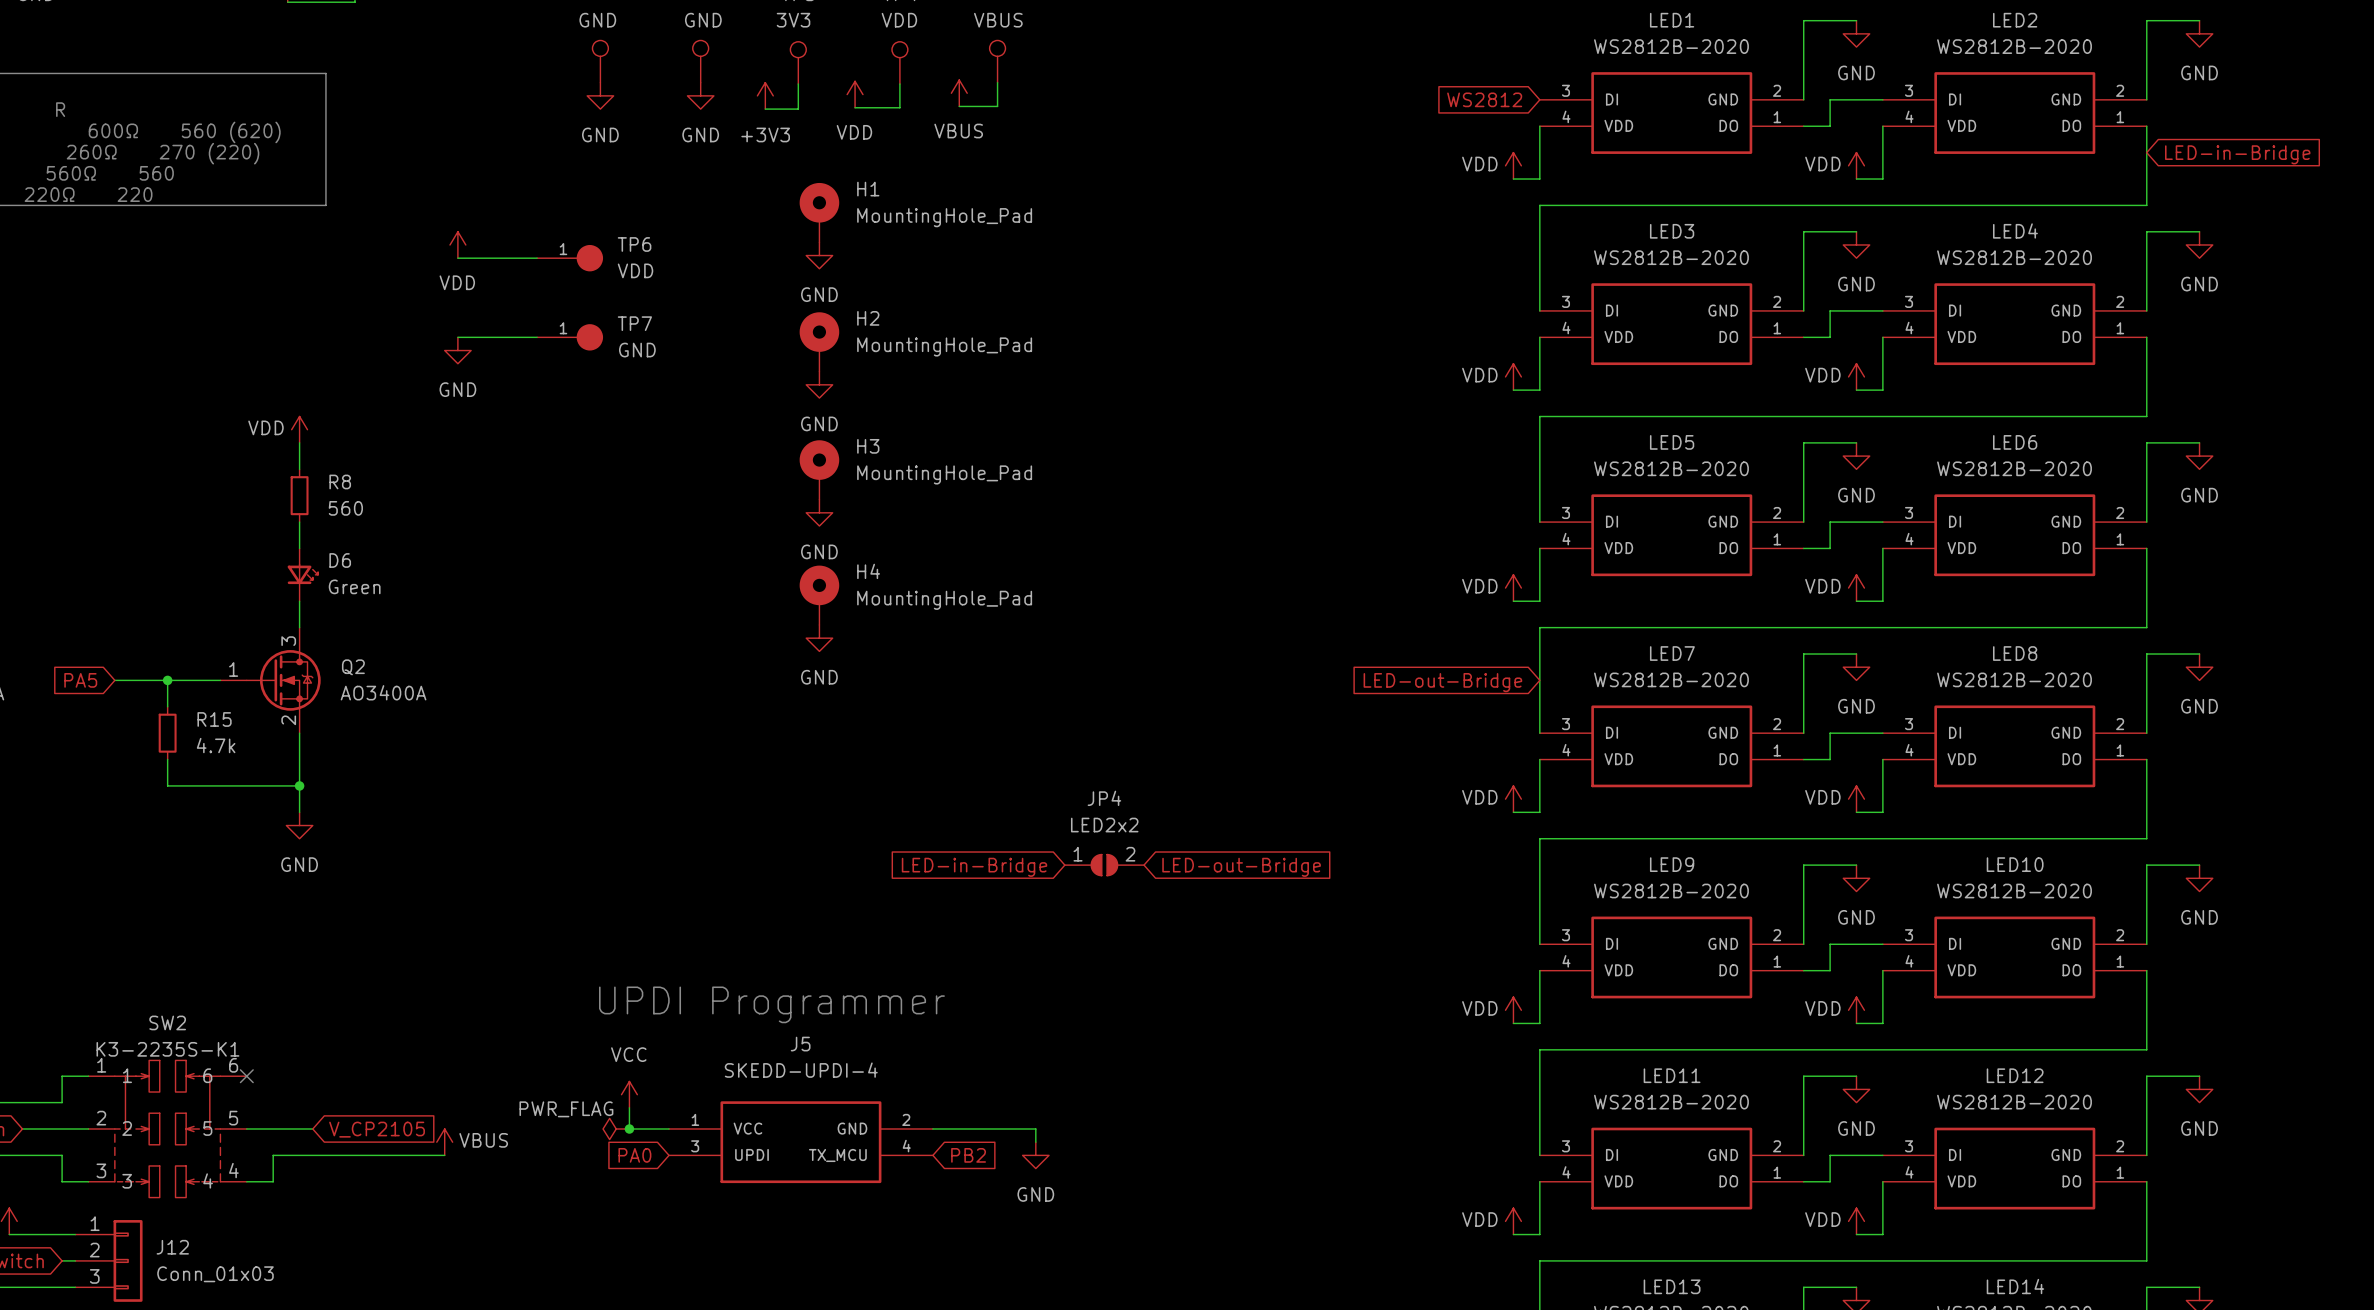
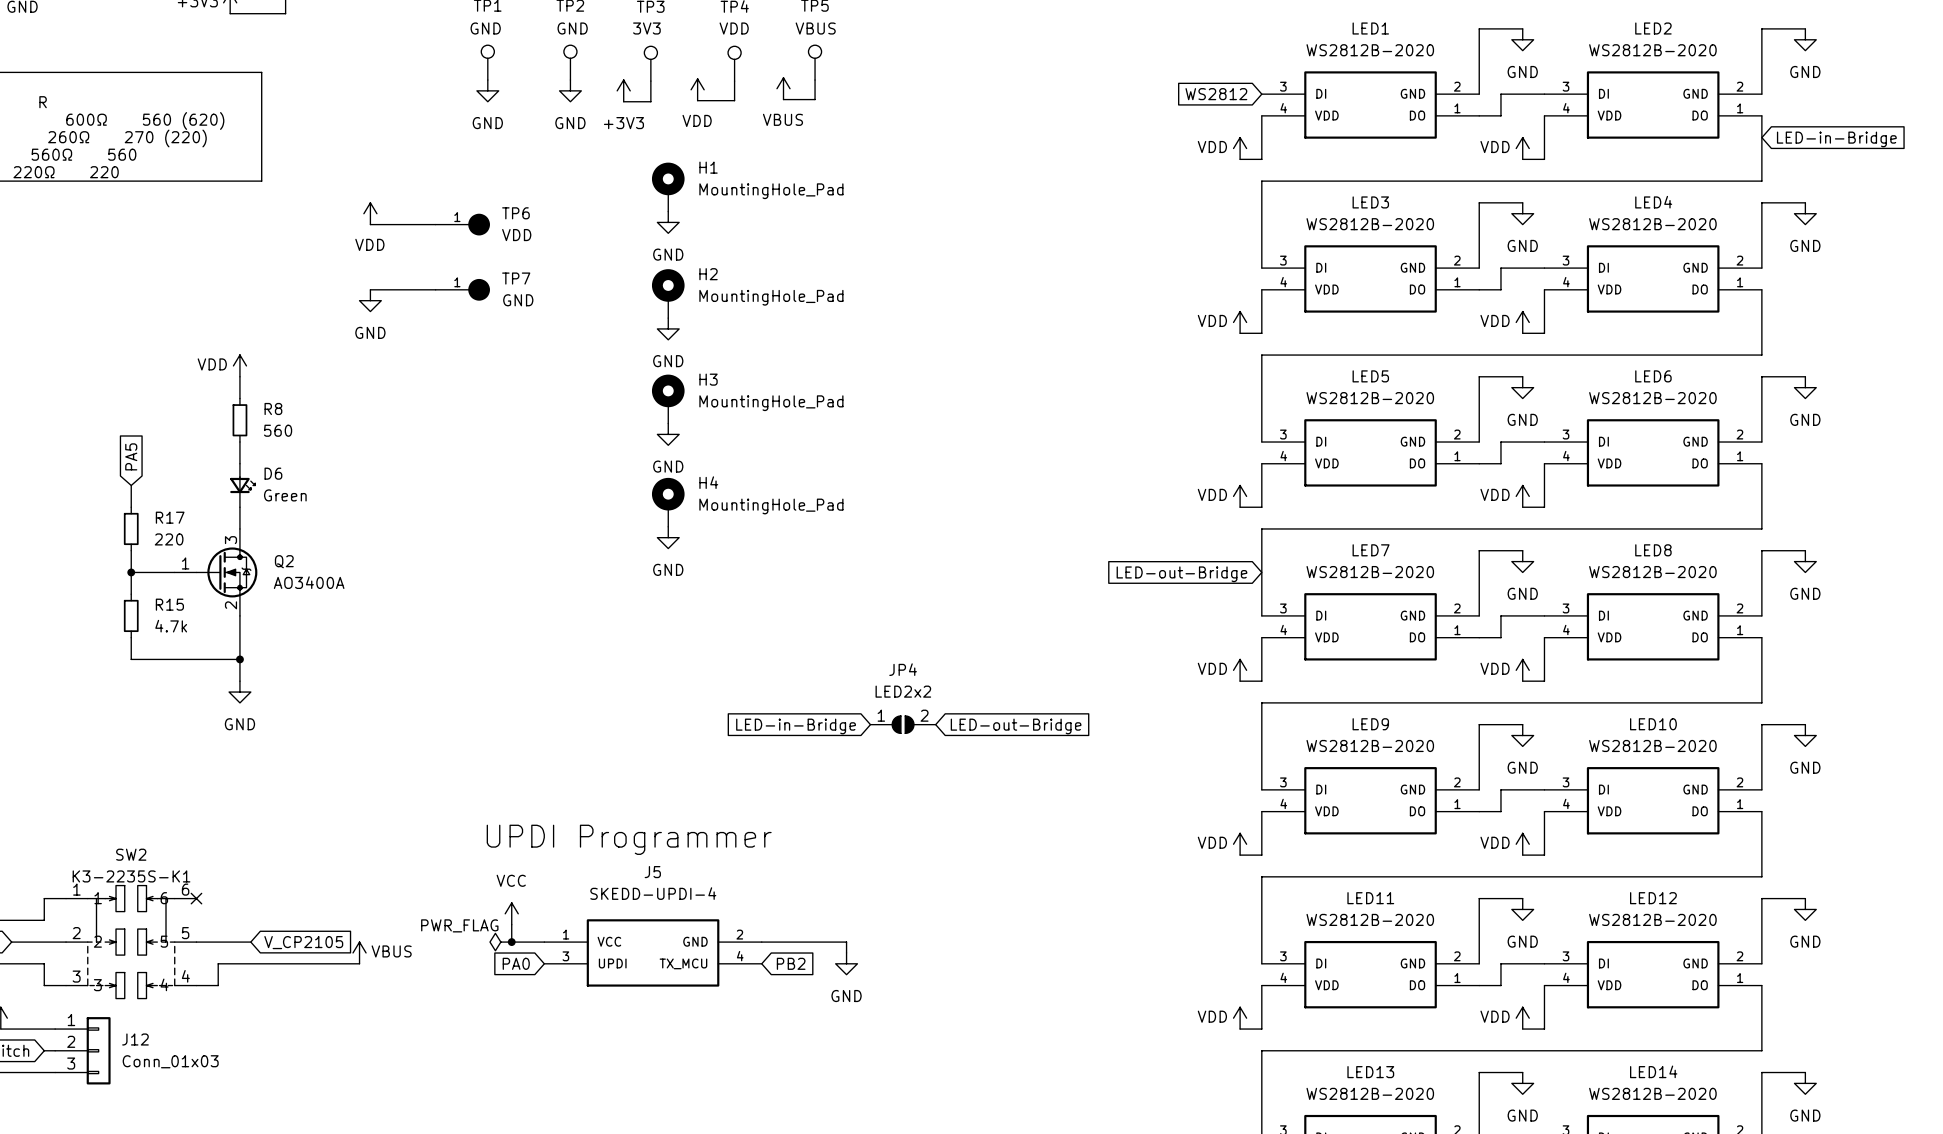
wire: none -> (131, 485) (131, 507)
R17: none -> 220 (131, 528)
global label rotation: 0° (80, 680) -> 90° clockwise (131, 456)
global label position: PA5 (80, 680) -> PA5 (131, 456)
wire: (114, 680) (167, 680) -> (131, 550) (131, 572)

